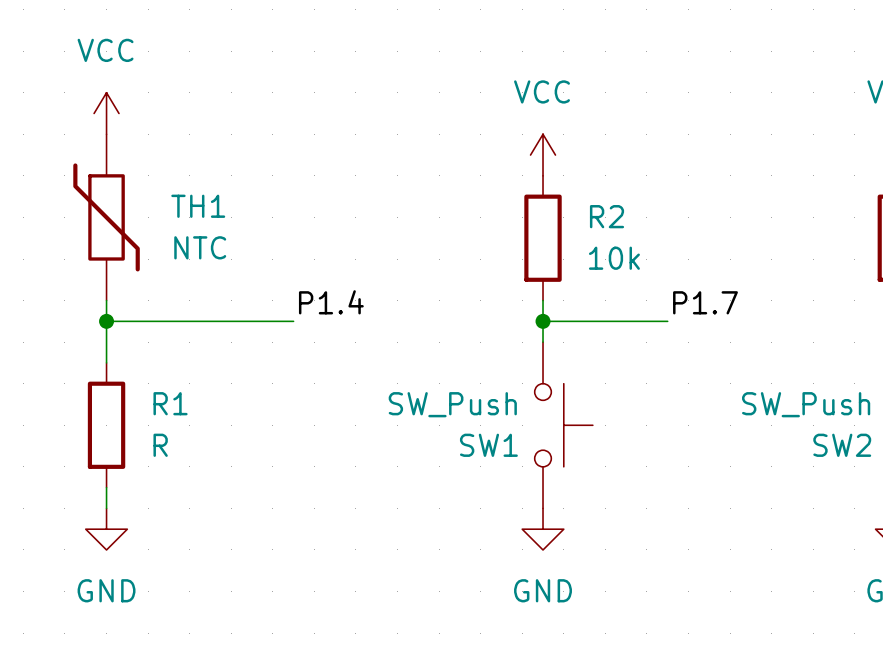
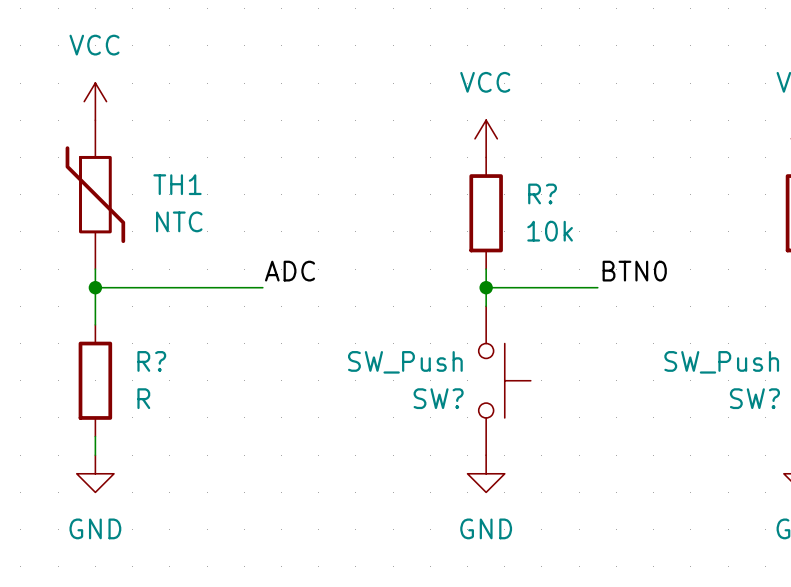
R2 name: R2 (607, 216) -> R? (542, 193)
label: P1.4 (331, 302) -> ADC (290, 271)
label: P1.7 (705, 302) -> BTN0 (634, 271)
R1 name: R1 (170, 403) -> R? (151, 361)
SW1 name: SW1 (488, 445) -> SW? (438, 398)
SW2 name: SW2 (842, 445) -> SW? (754, 398)

